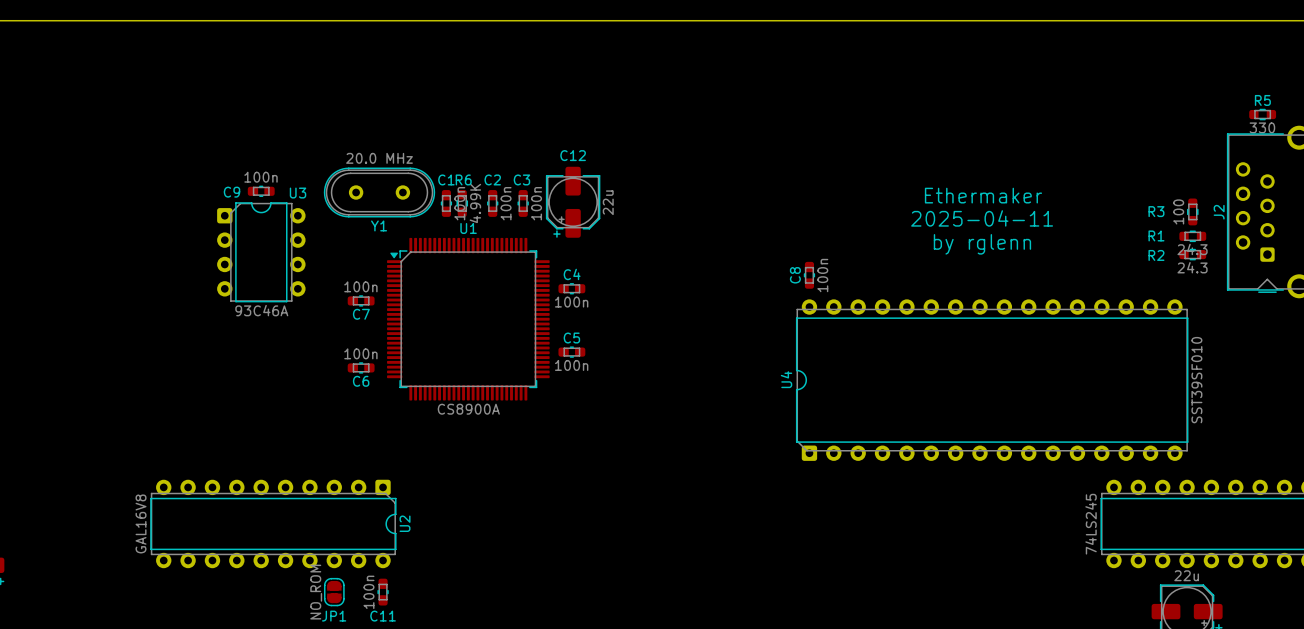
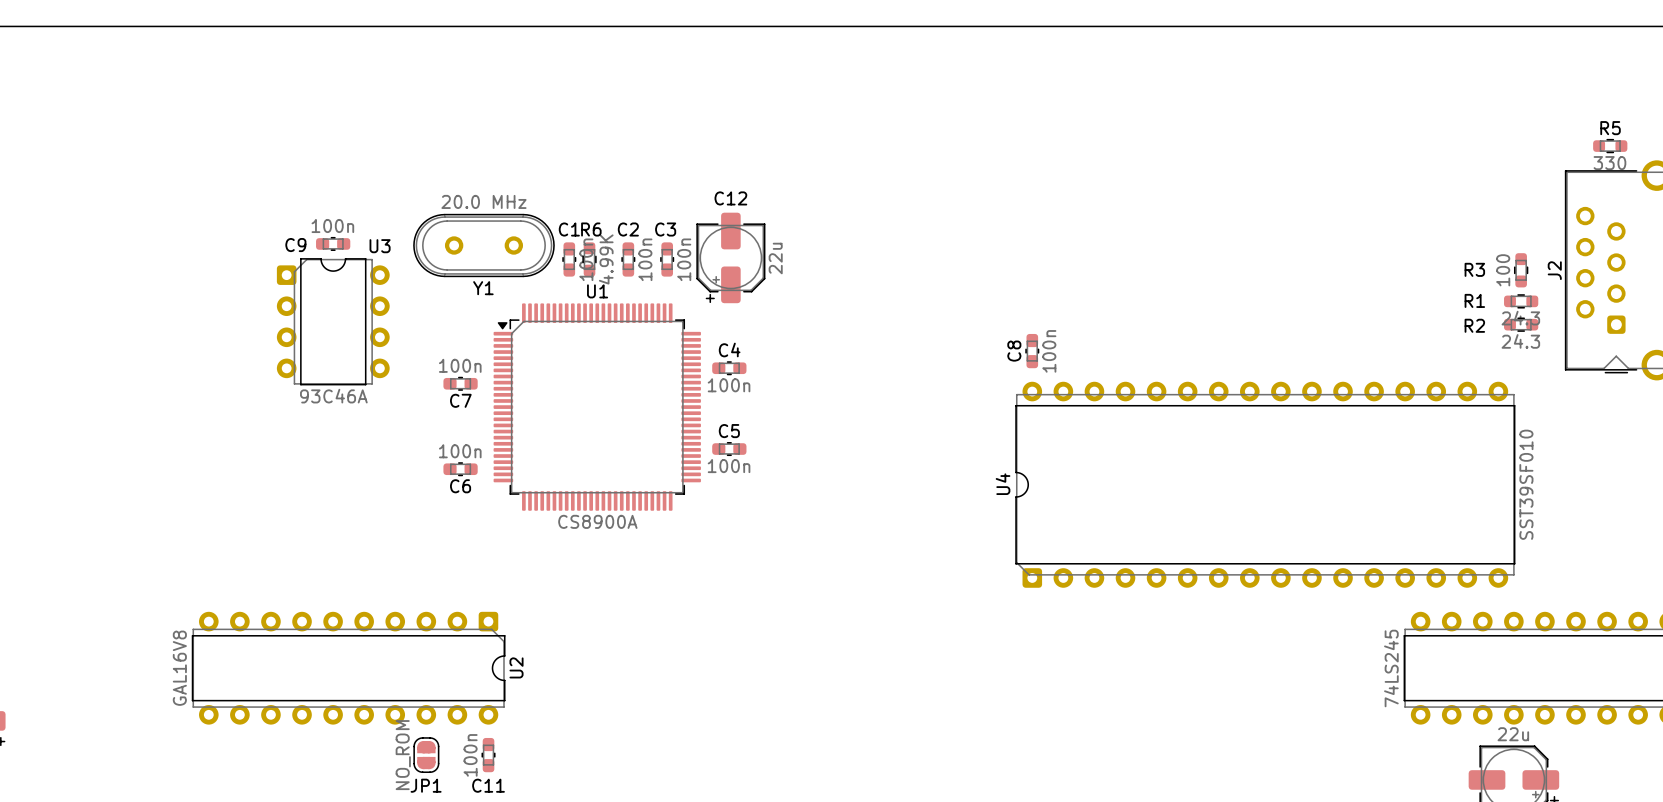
text: Ethermaker (983, 195) -> none
text: 2025-04-11 (982, 218) -> none
text: by rglenn (982, 244) -> none

